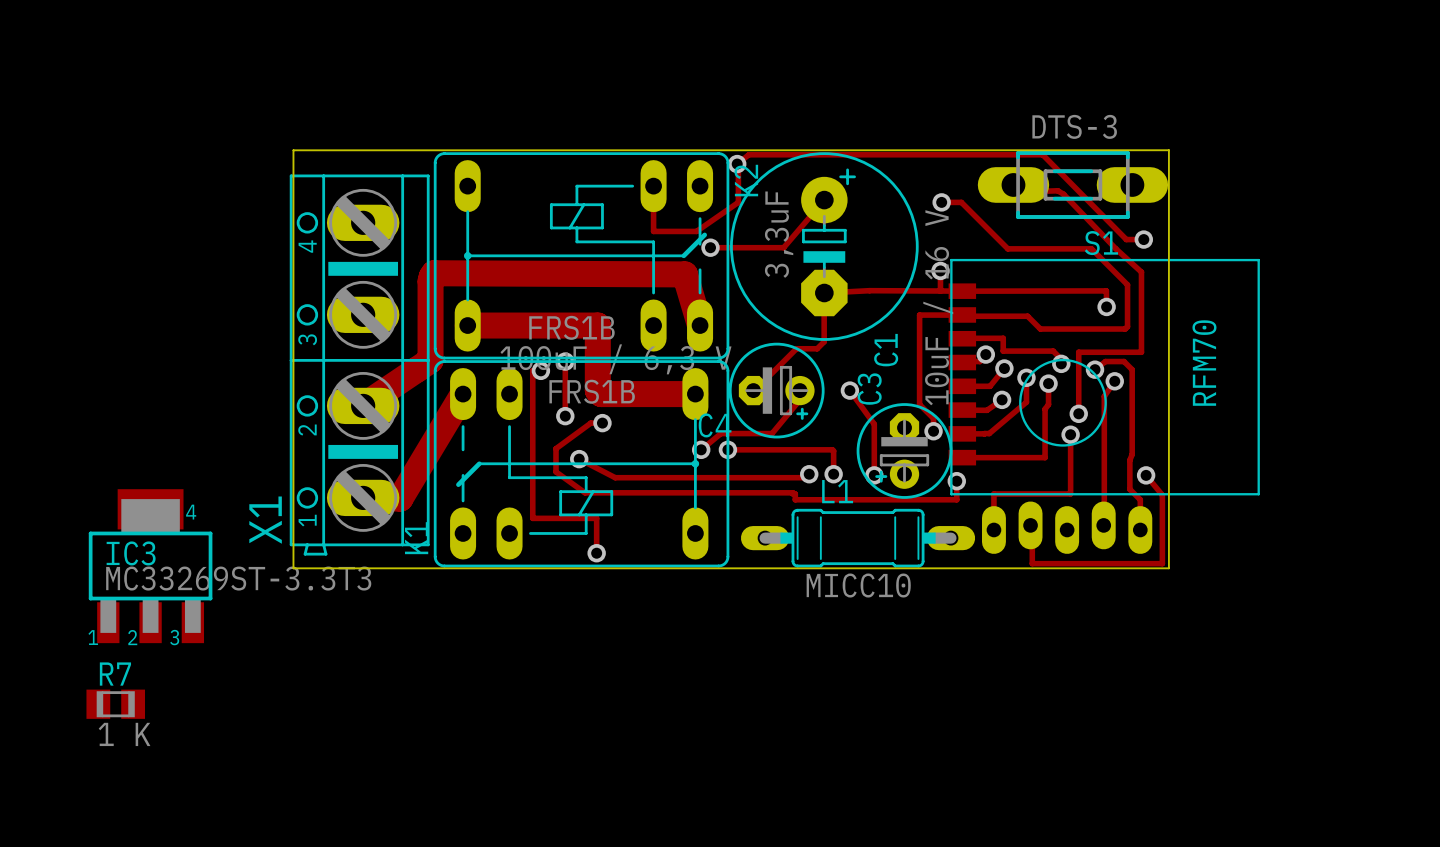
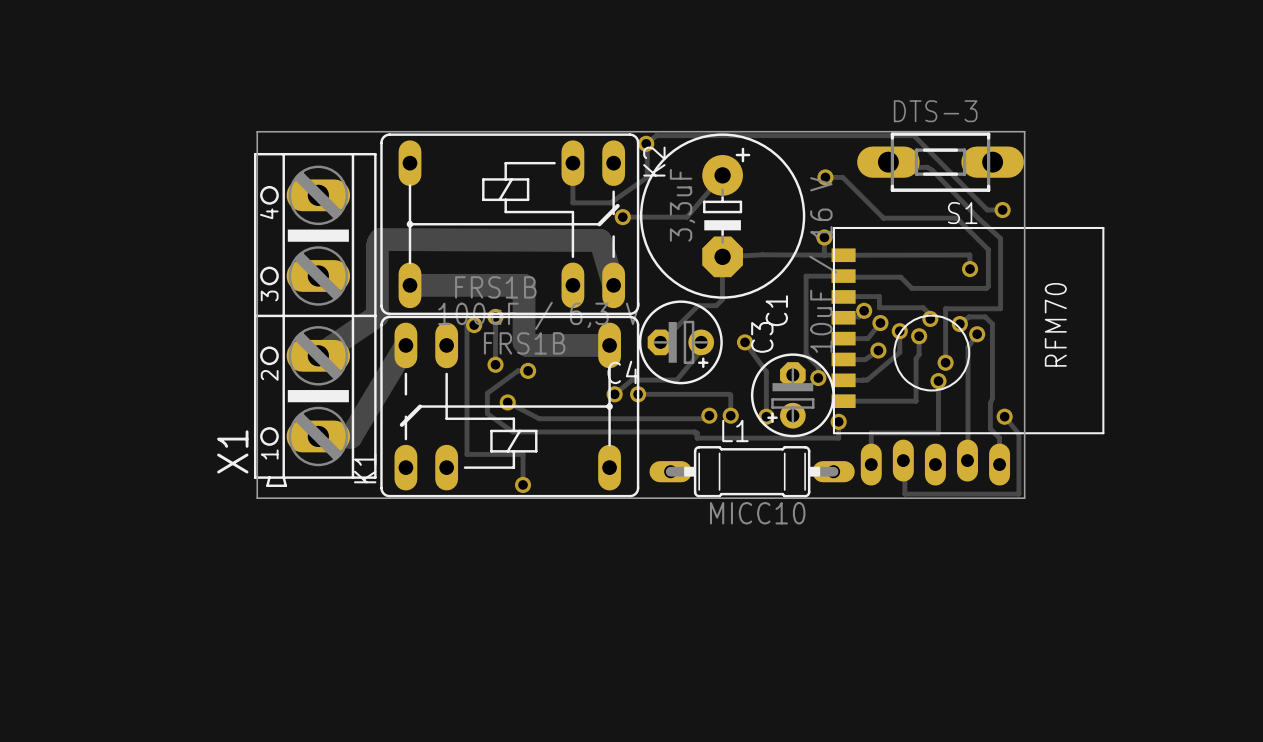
IC3: MC33269ST-3.3T3 (150, 566) -> none
R7: 1 K (115, 704) -> none

